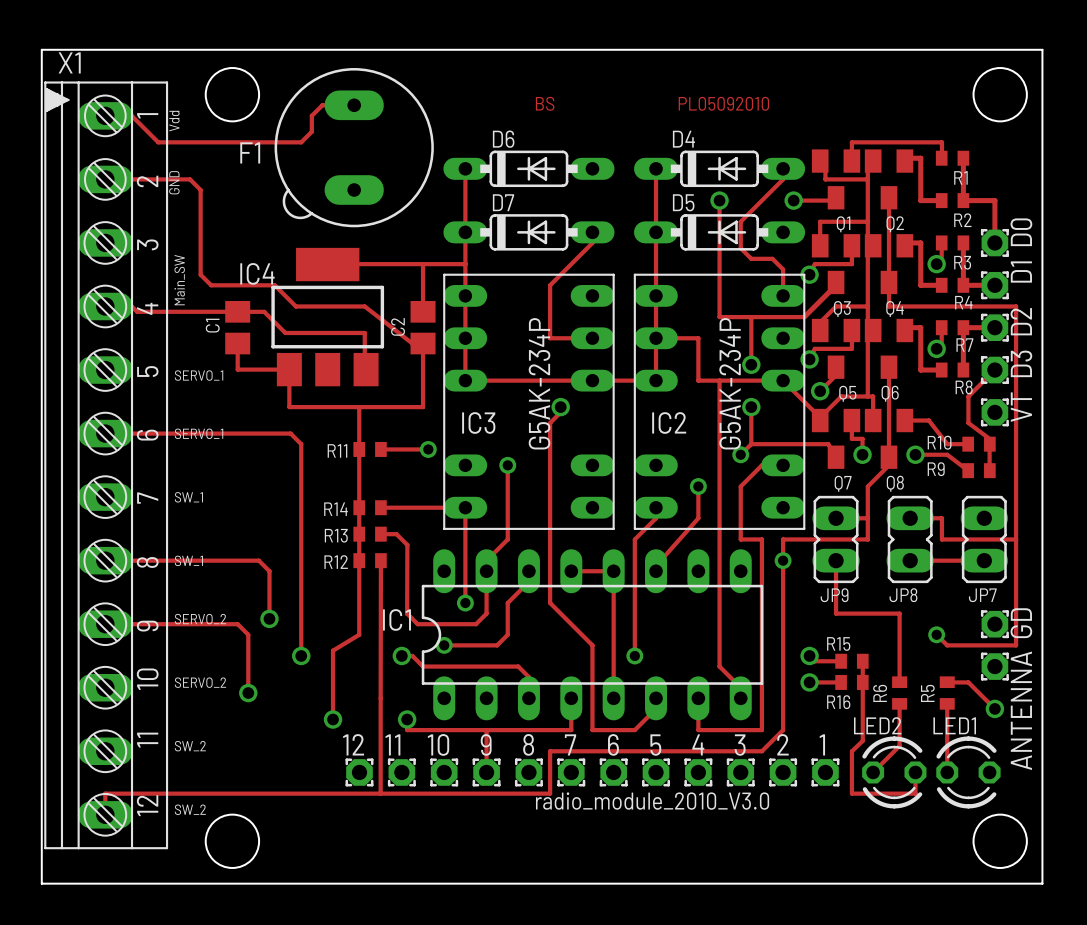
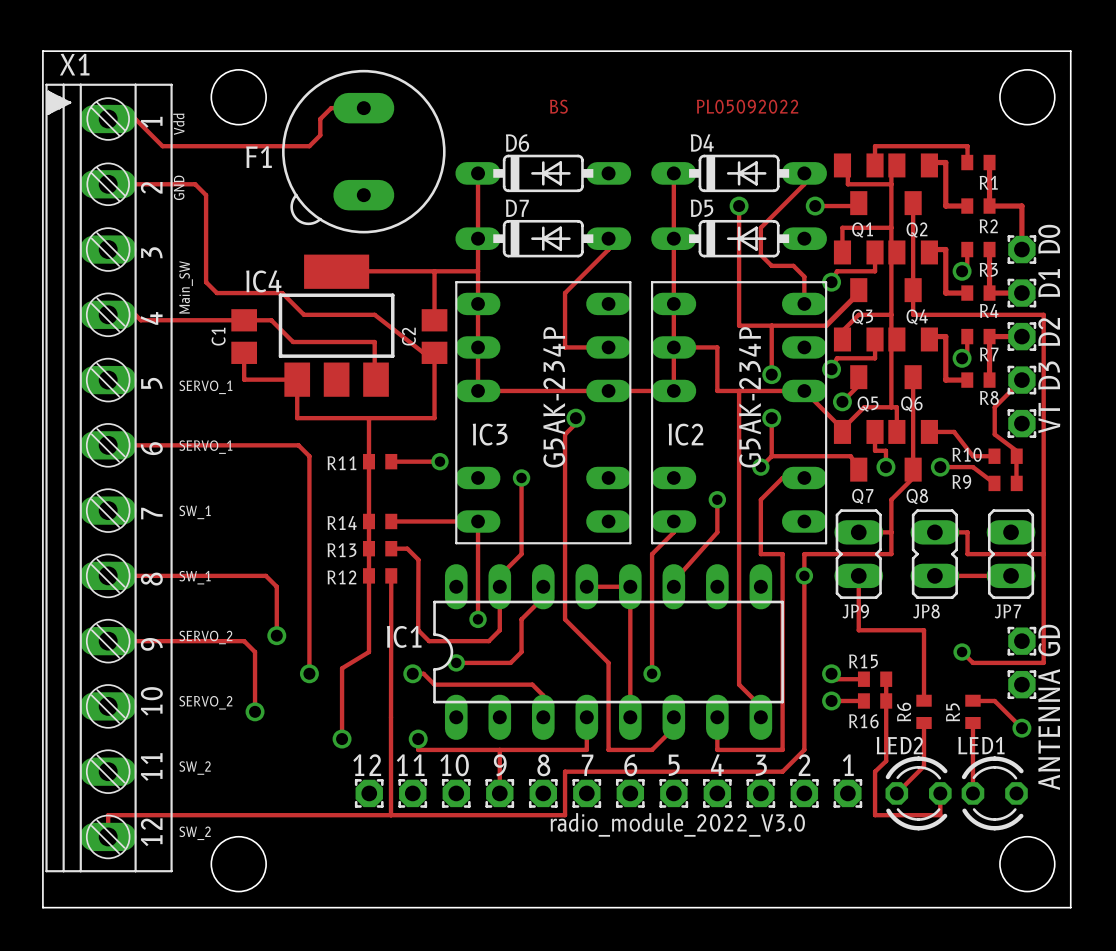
text: PL05092010 (723, 103) -> PL05092022 (747, 106)
text: radio_module_2010_V3.0 (652, 801) -> radio_module_2022_V3.0 (677, 824)

